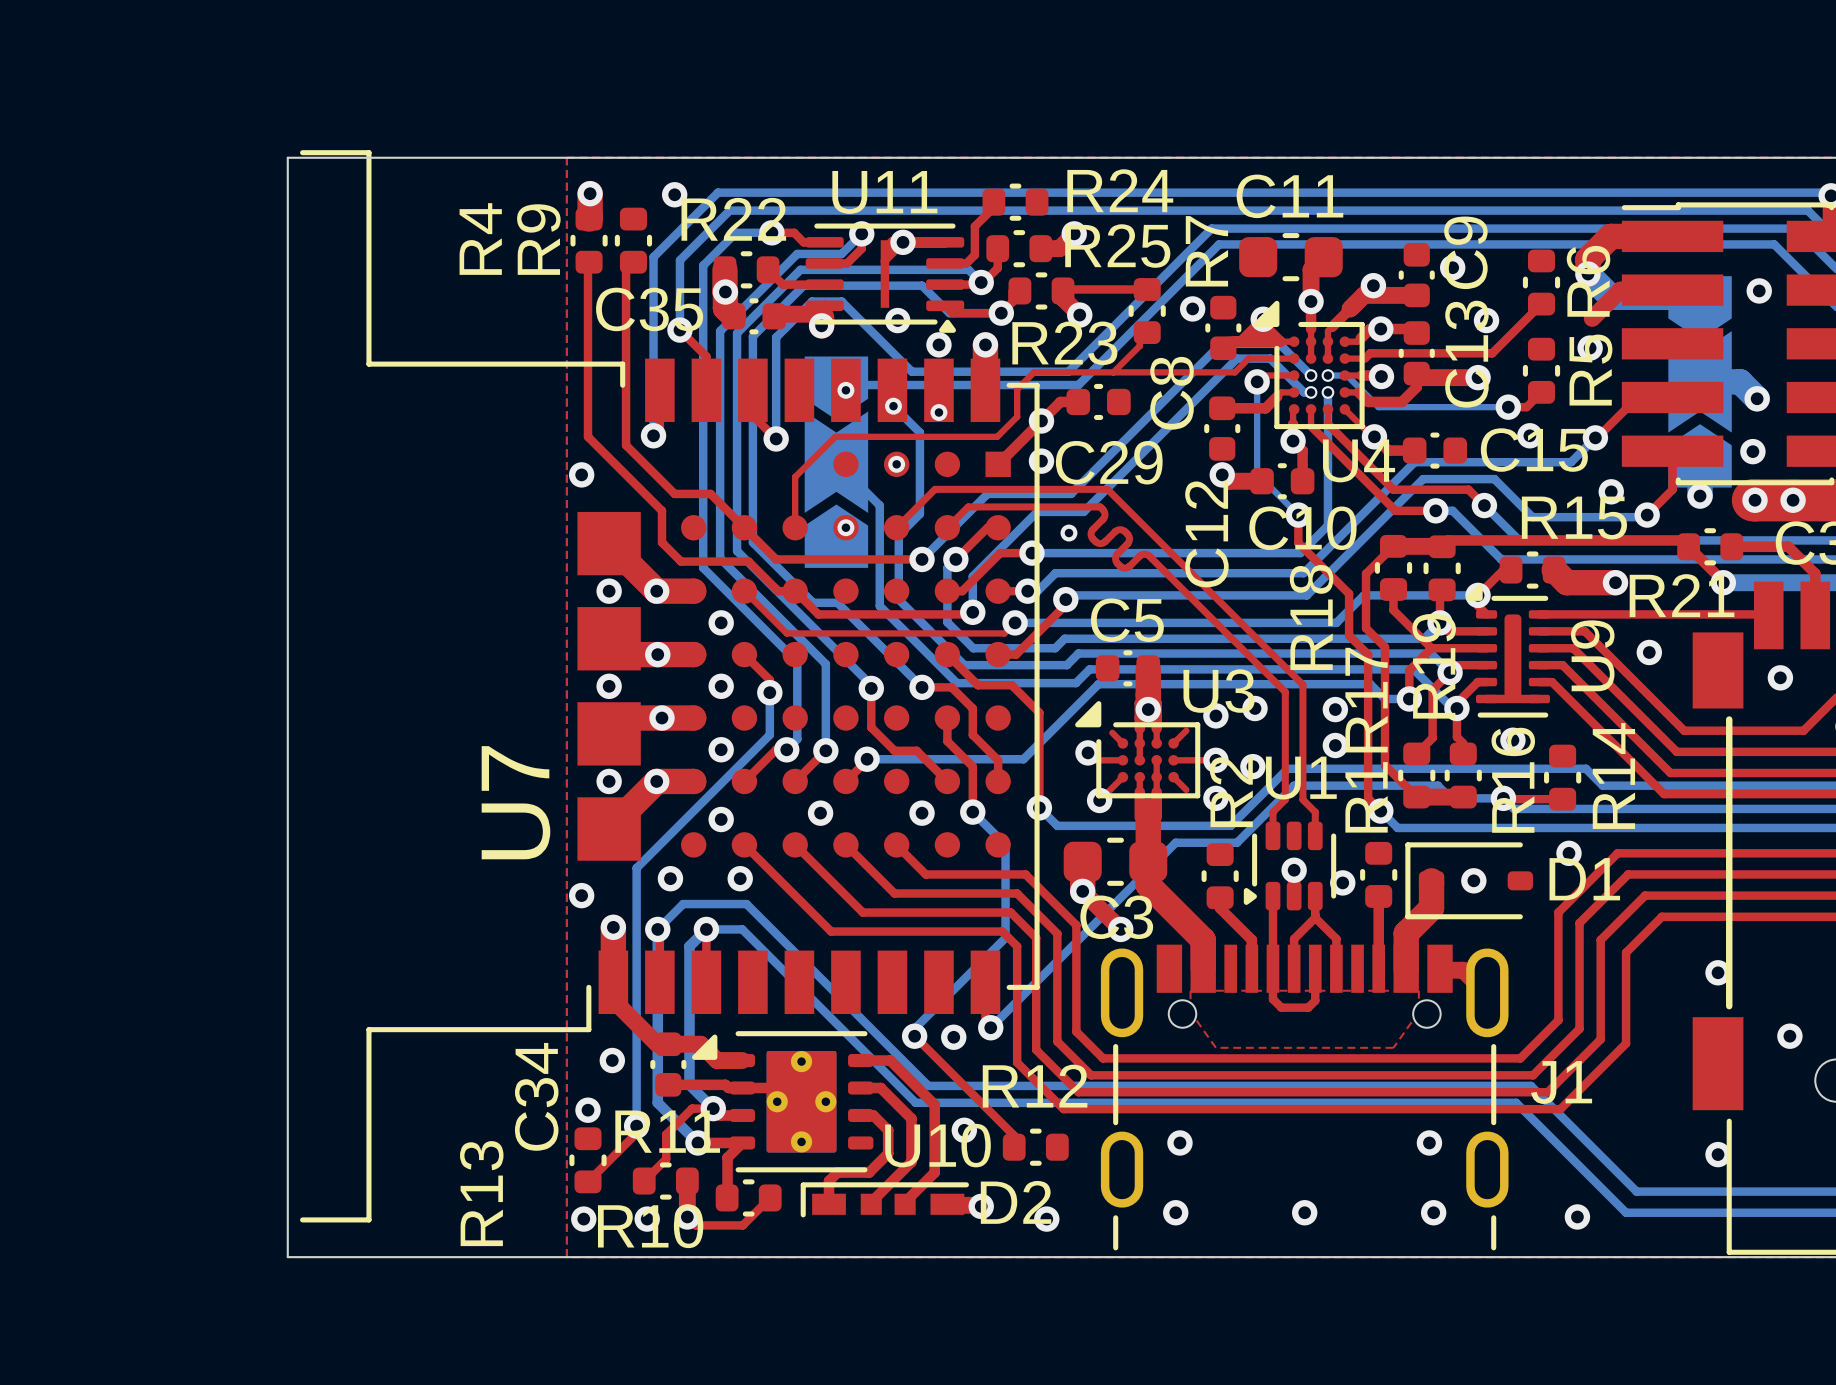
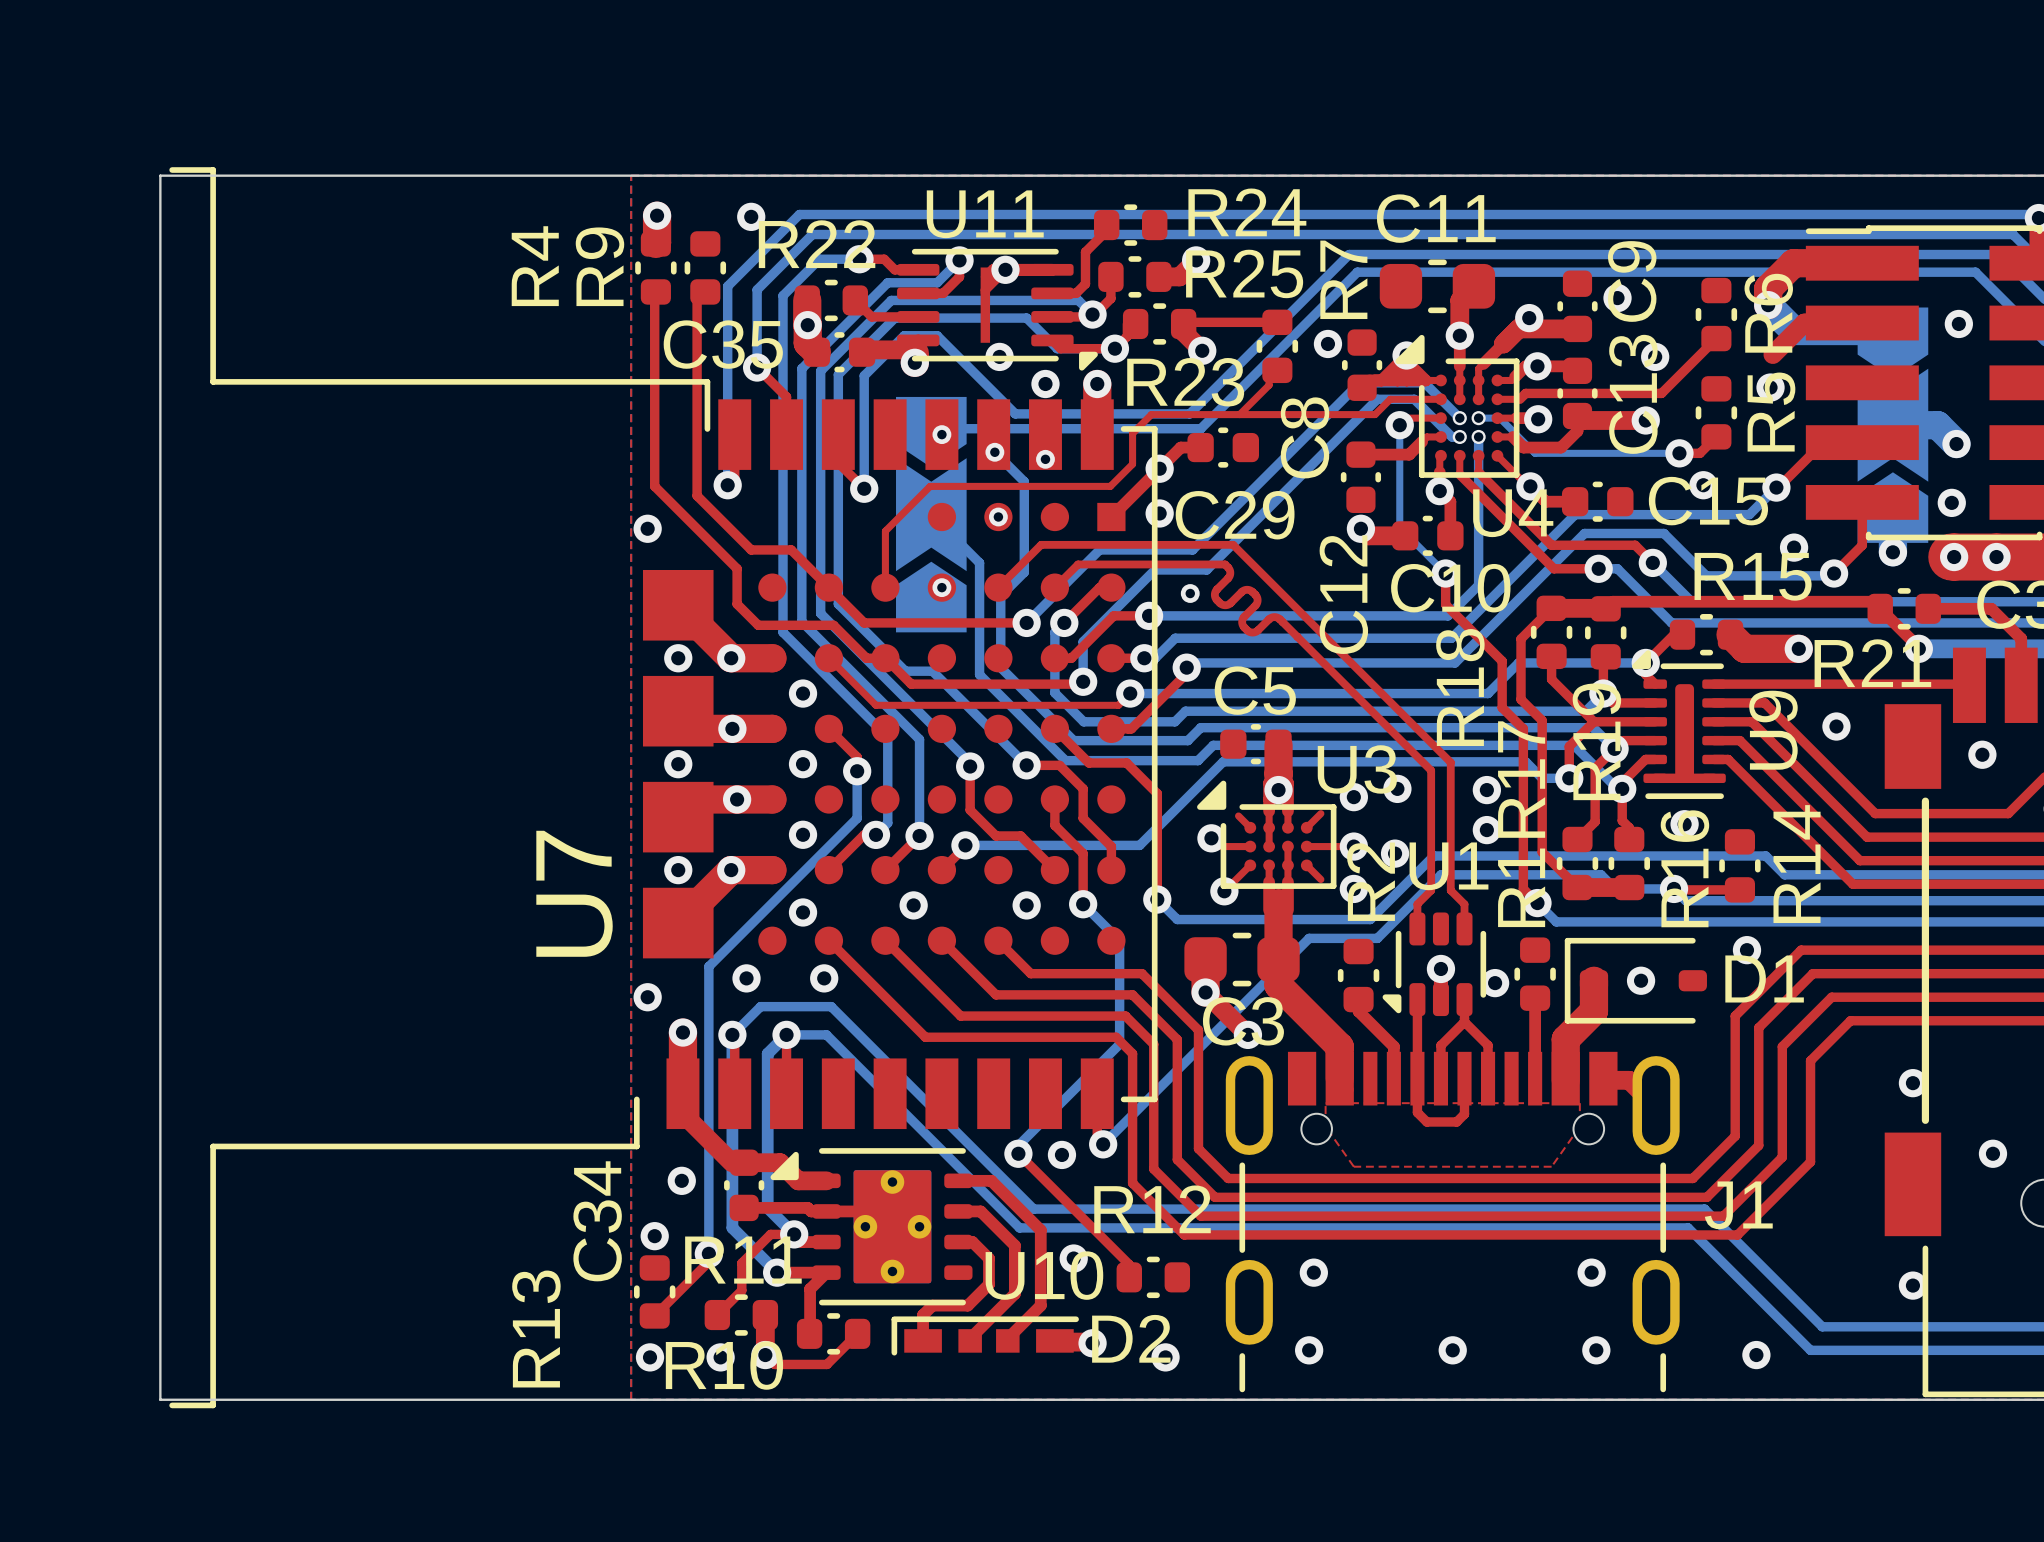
U7 footprint: [300, 150, 1040, 1223] -> [169, 167, 1158, 1409]
board edge: (287, 157) (287, 1257) -> (320, 175) (160, 175) (160, 1399) (320, 1399)
U11 footprint: [805, 223, 965, 333] -> [897, 248, 1098, 371]
U1 footprint: [1243, 821, 1337, 911] -> [1382, 912, 1487, 1017]

